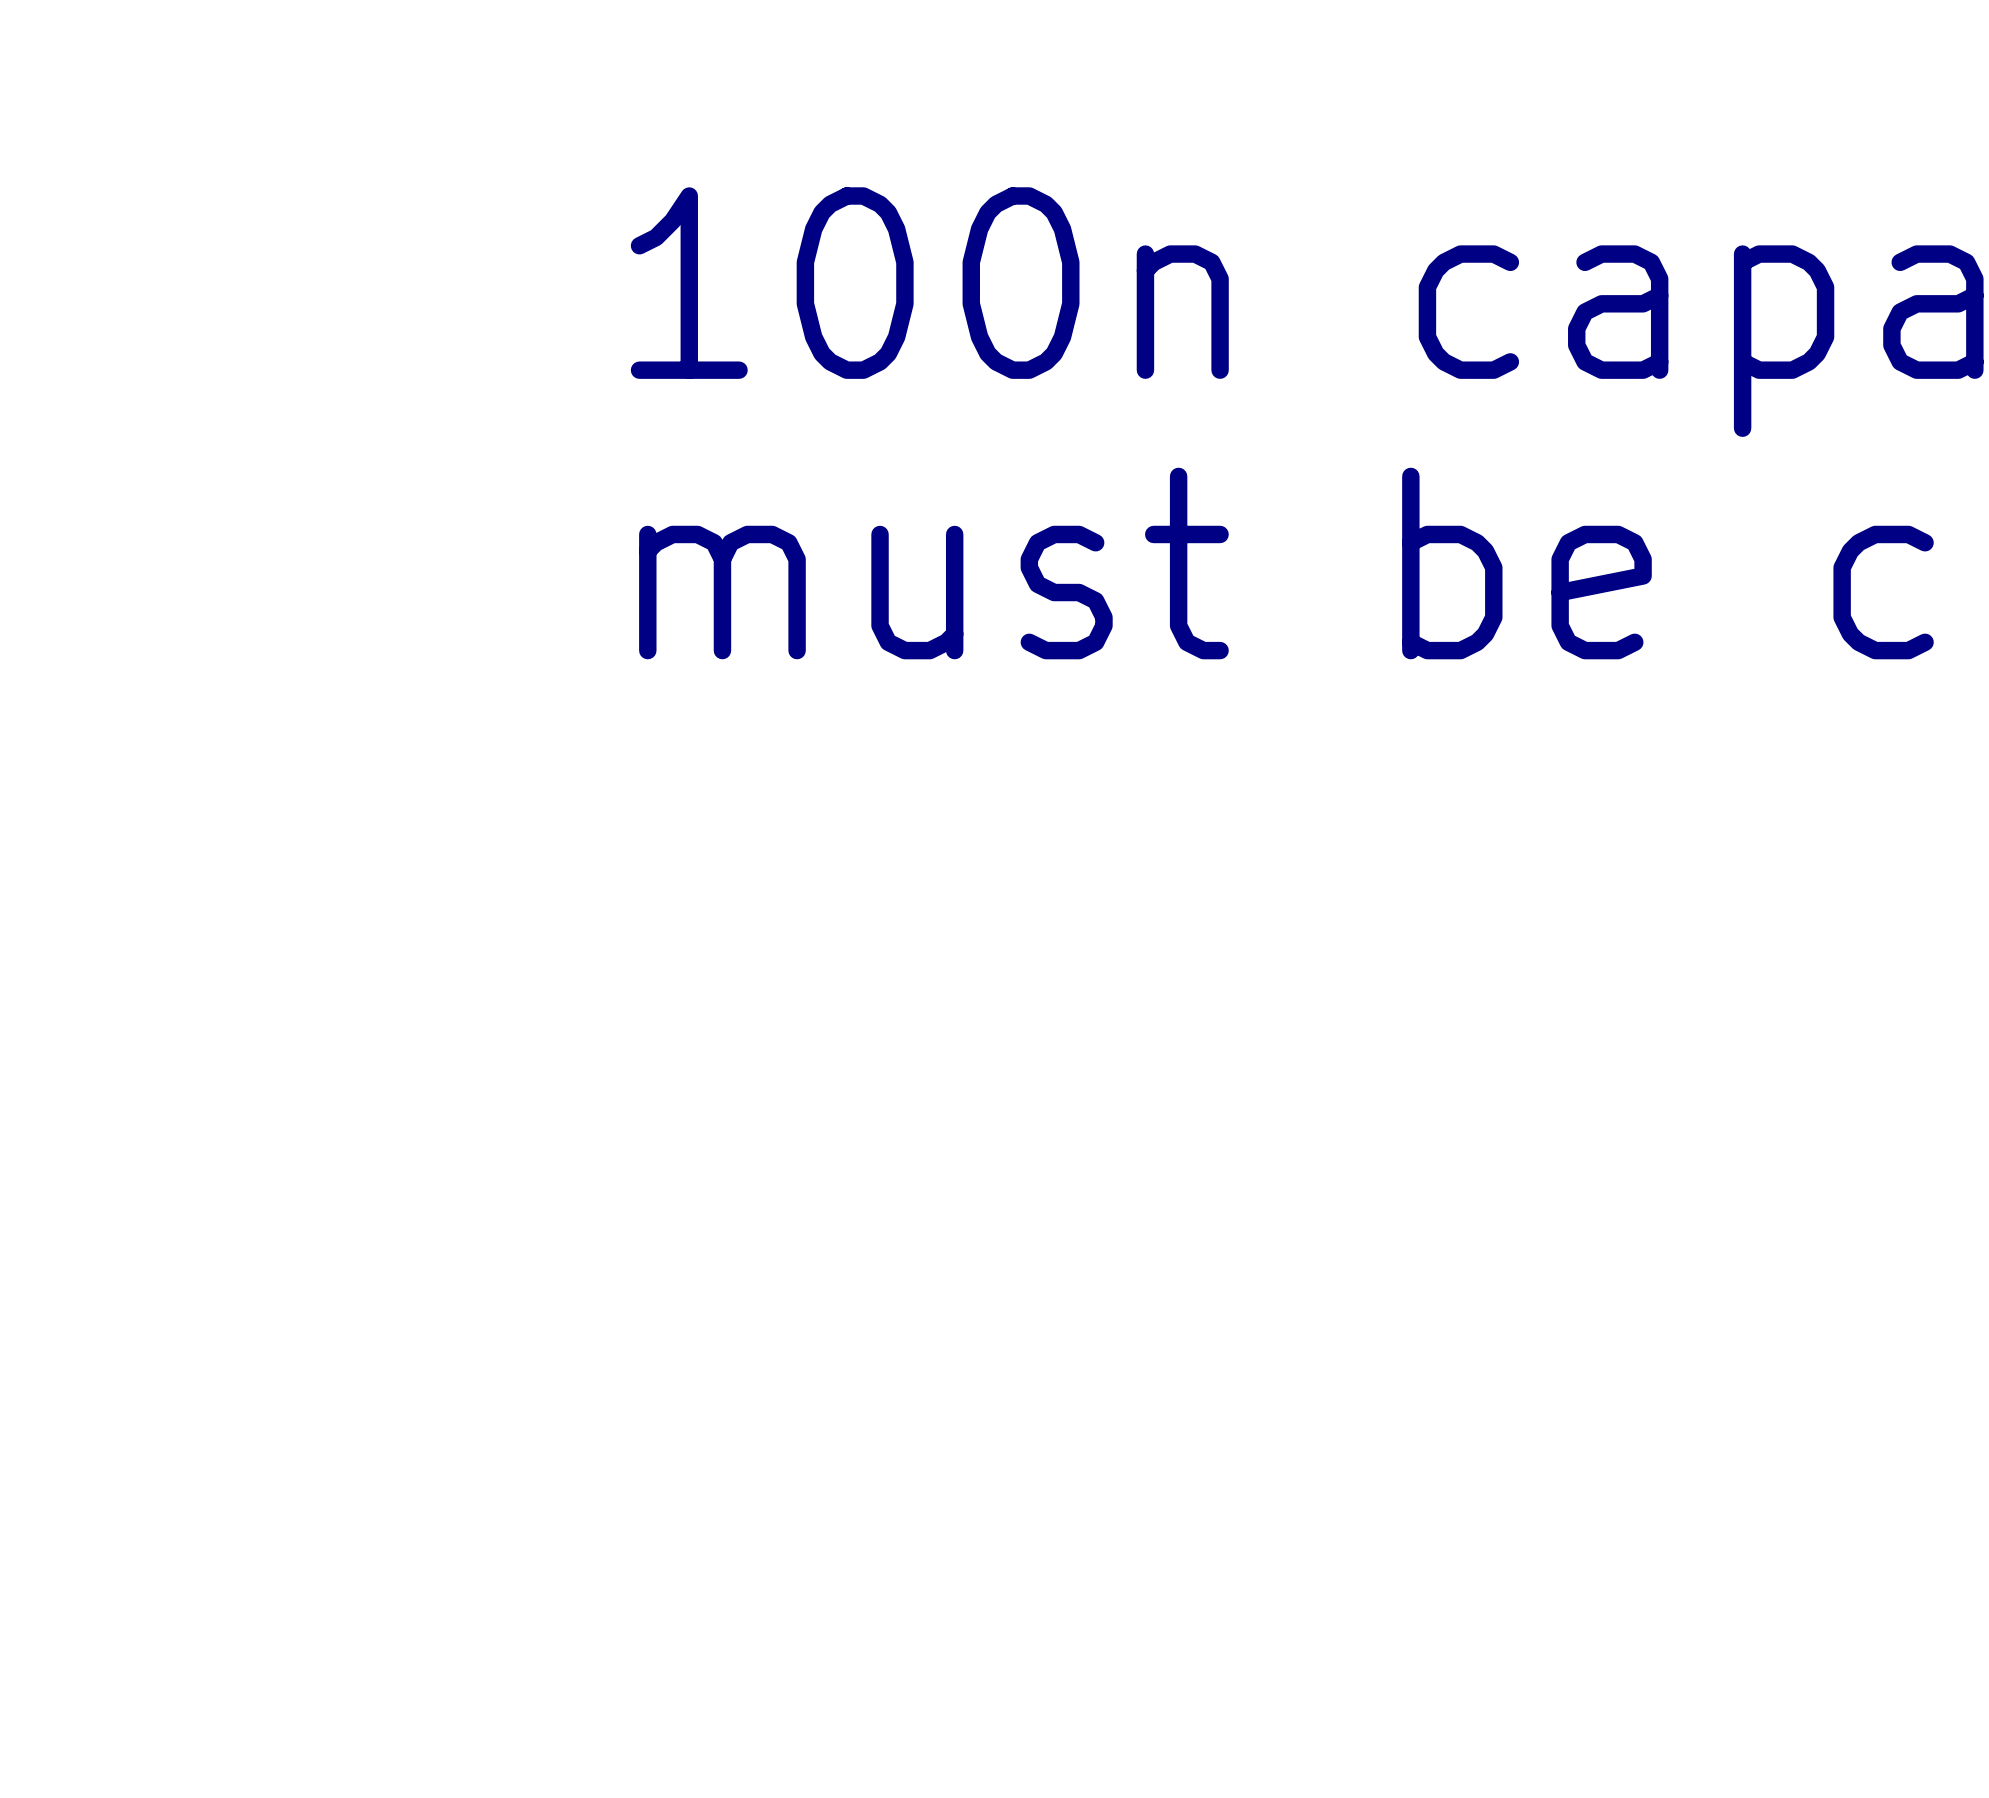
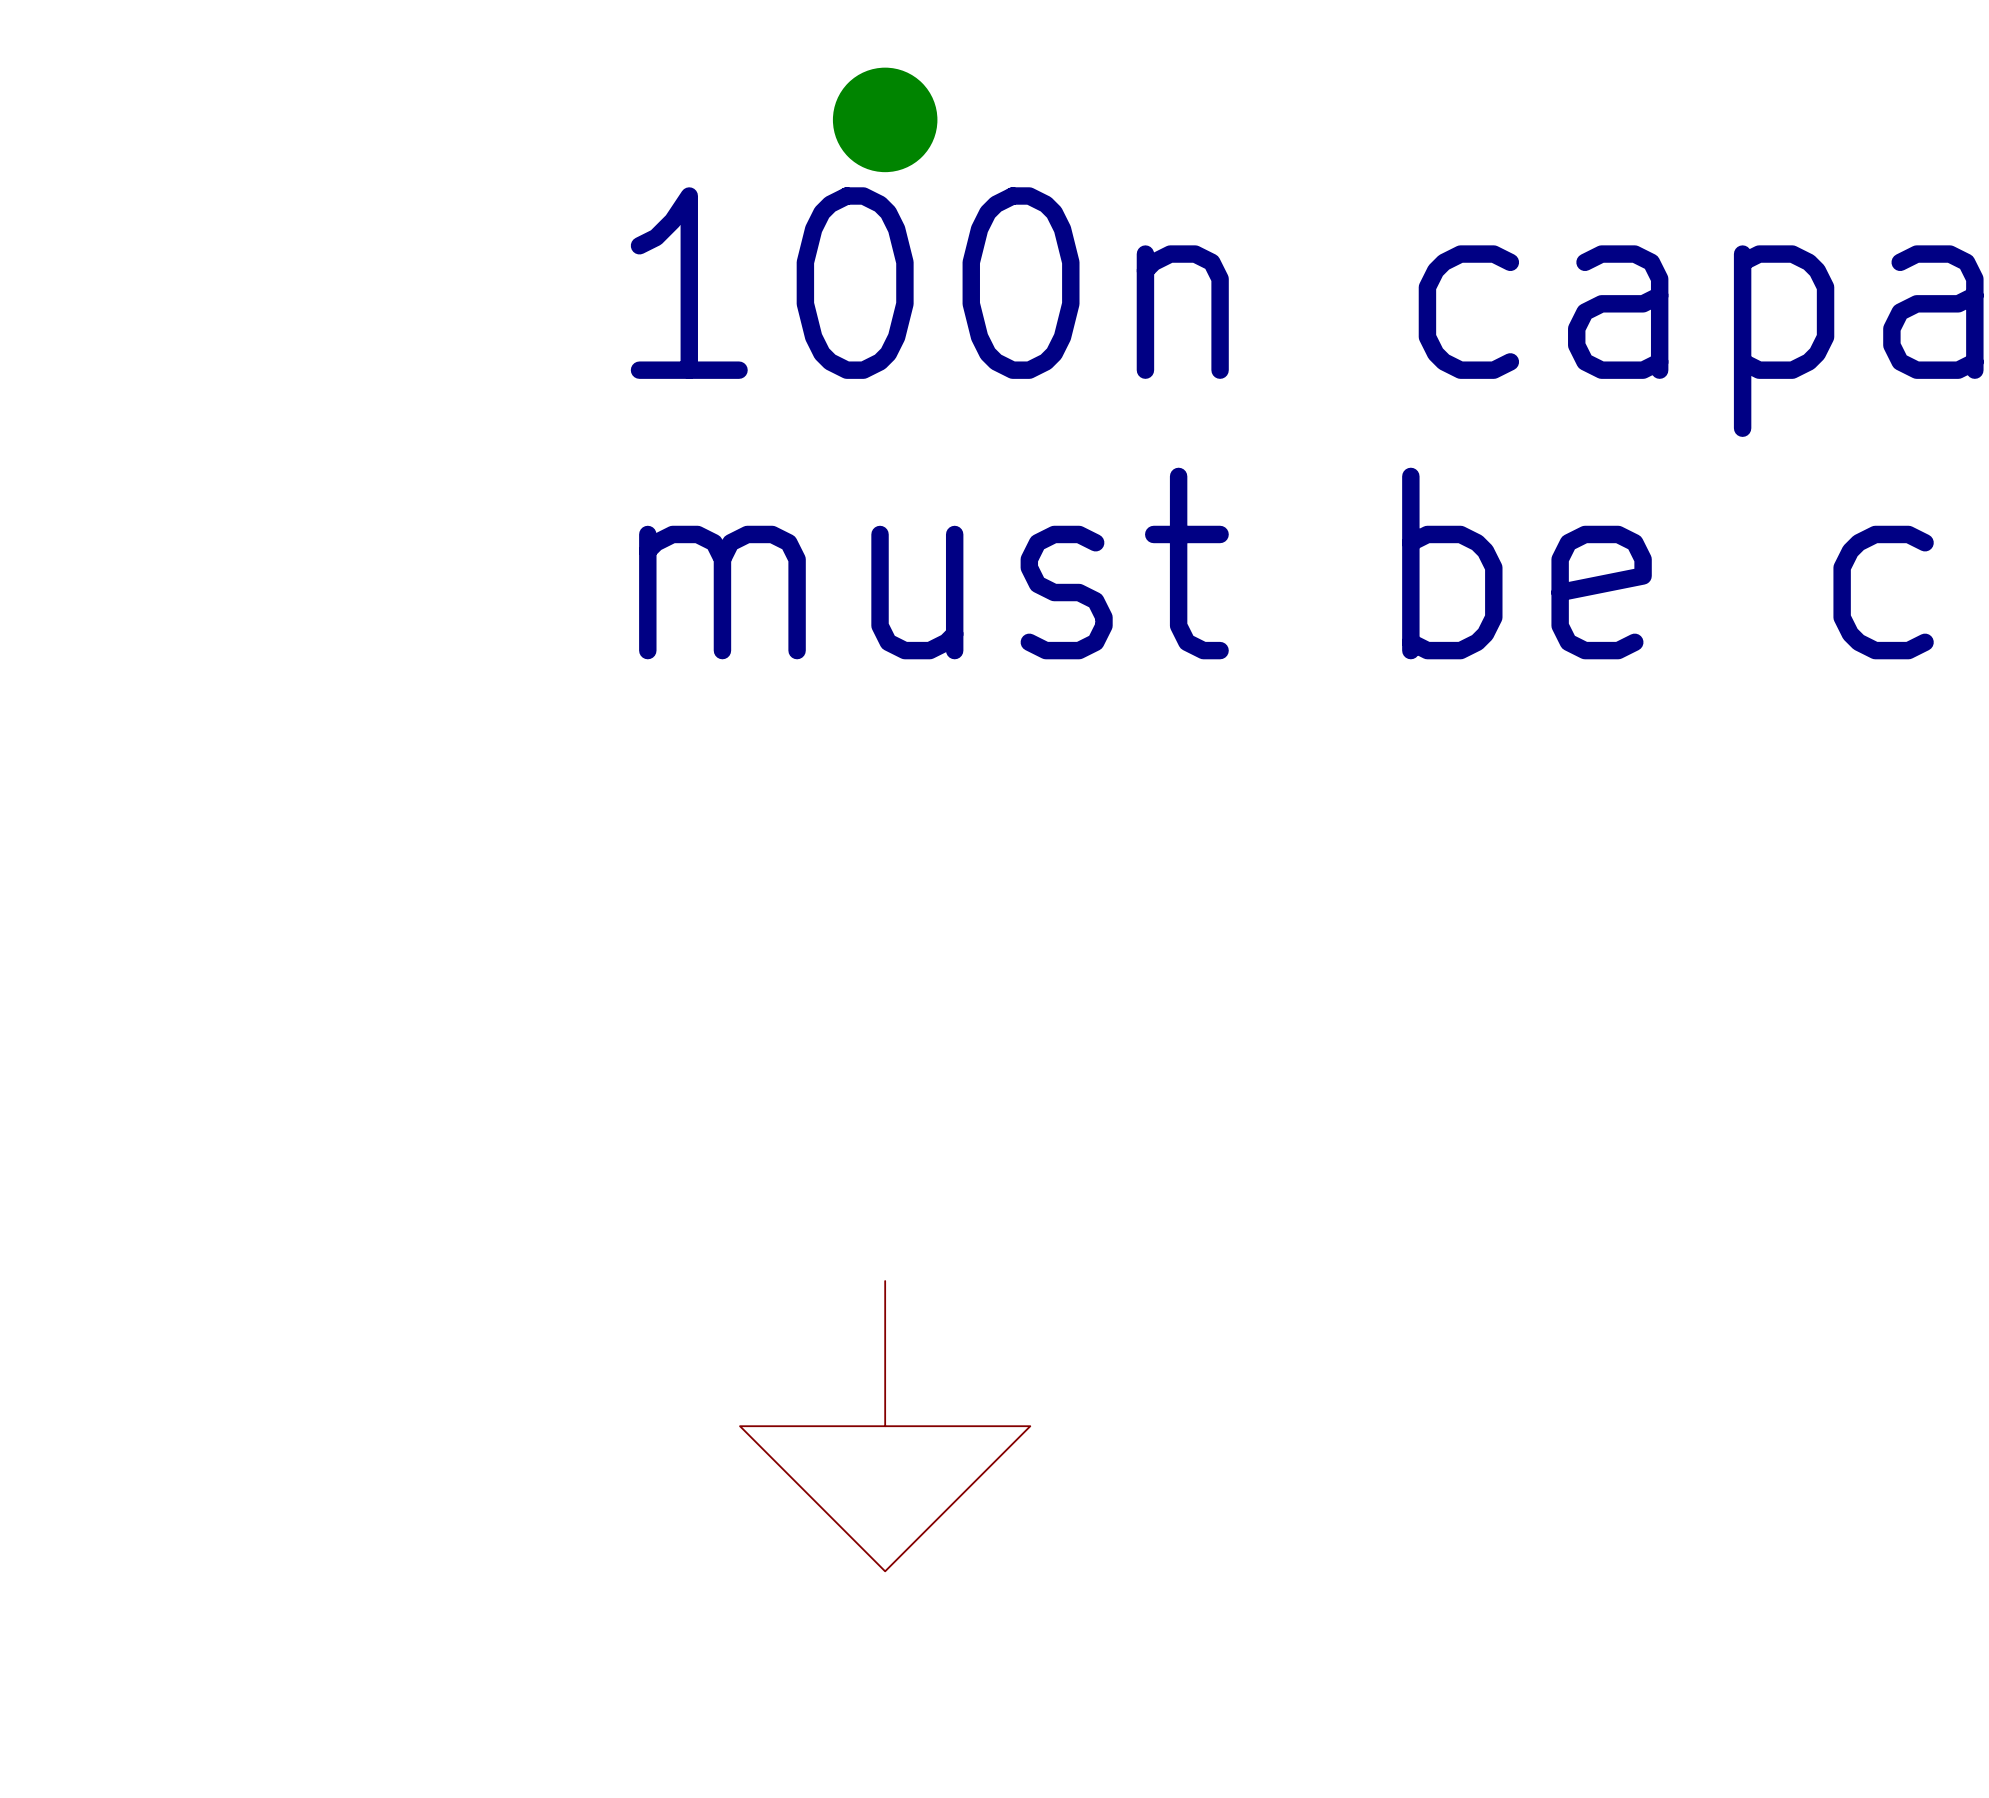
junction: none -> (885, 119)
power symbol: none -> (885, 1426)

